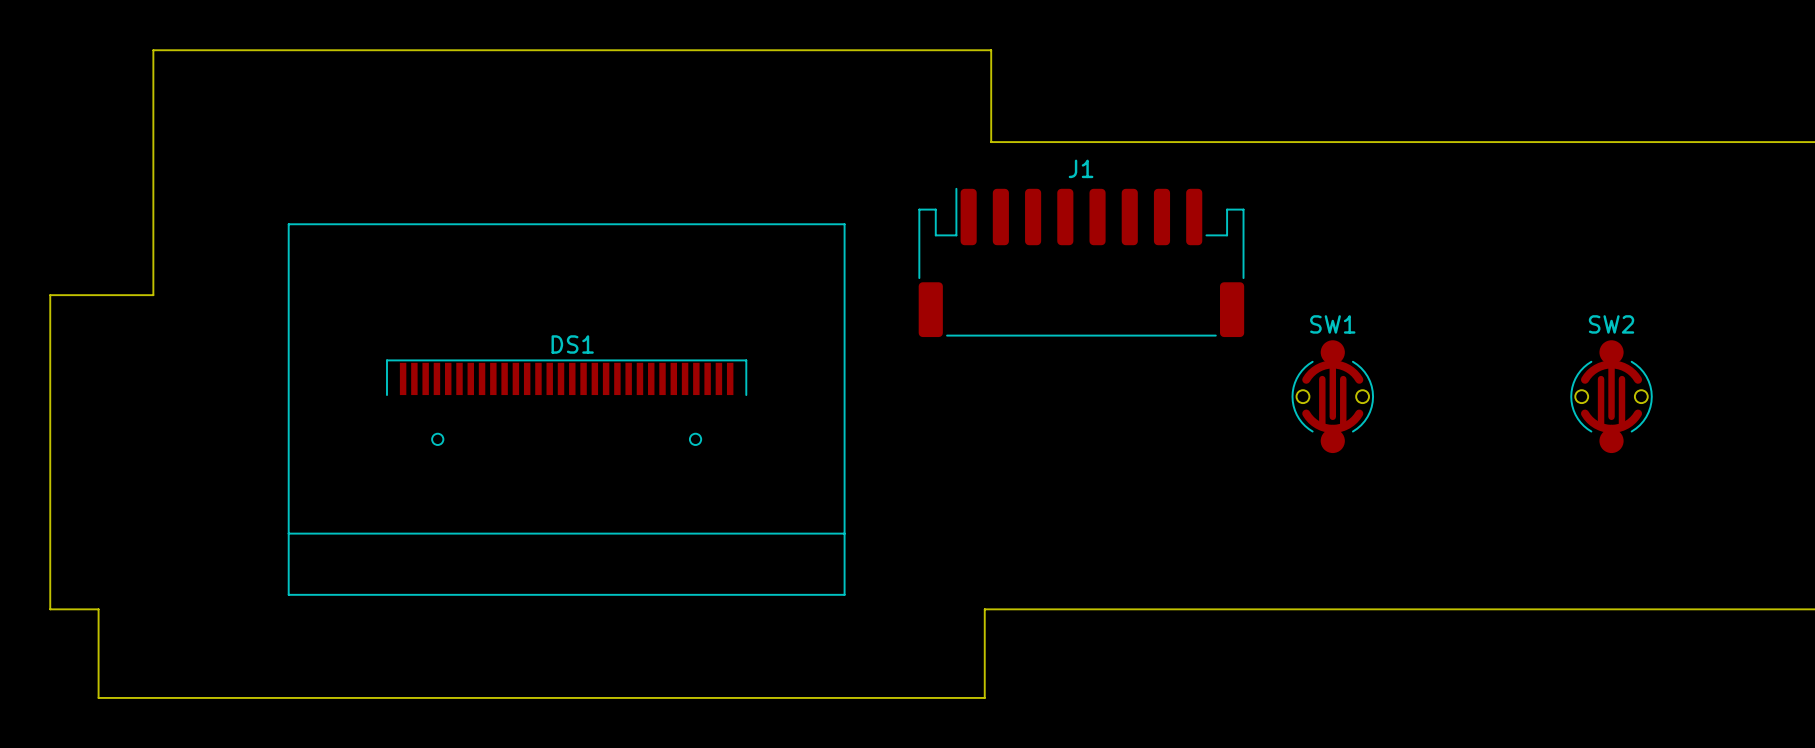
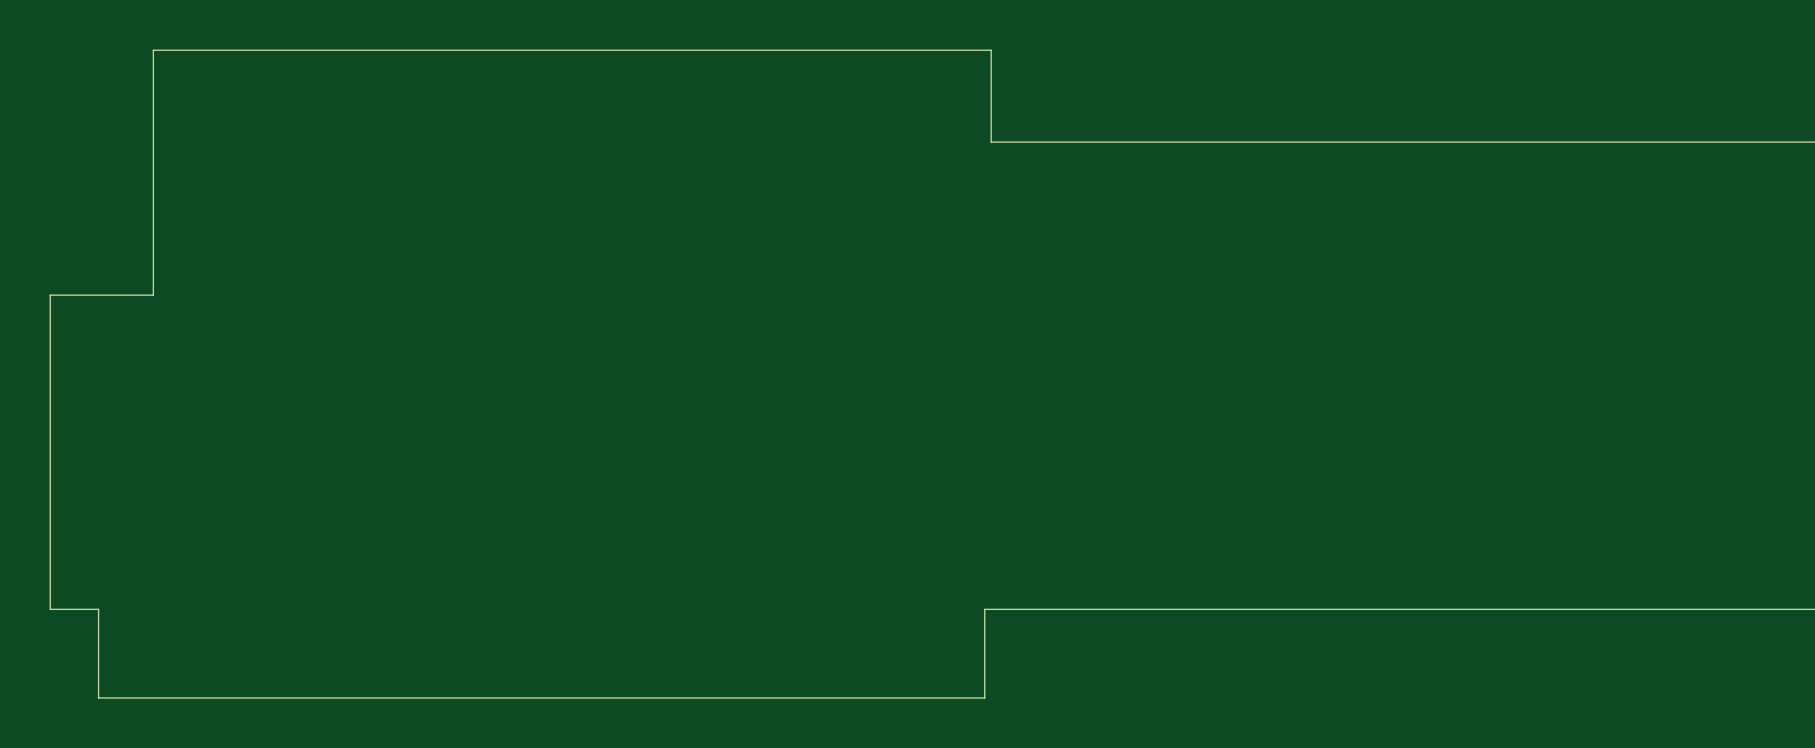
line: (288, 224) (288, 594) (844, 594) (844, 224) (288, 224) -> none
J1: (1081, 262) -> none
SW1: (1332, 396) -> none
SW2: (1611, 396) -> none
DS1: (566, 402) -> none
line: (288, 533) (844, 533) -> none

